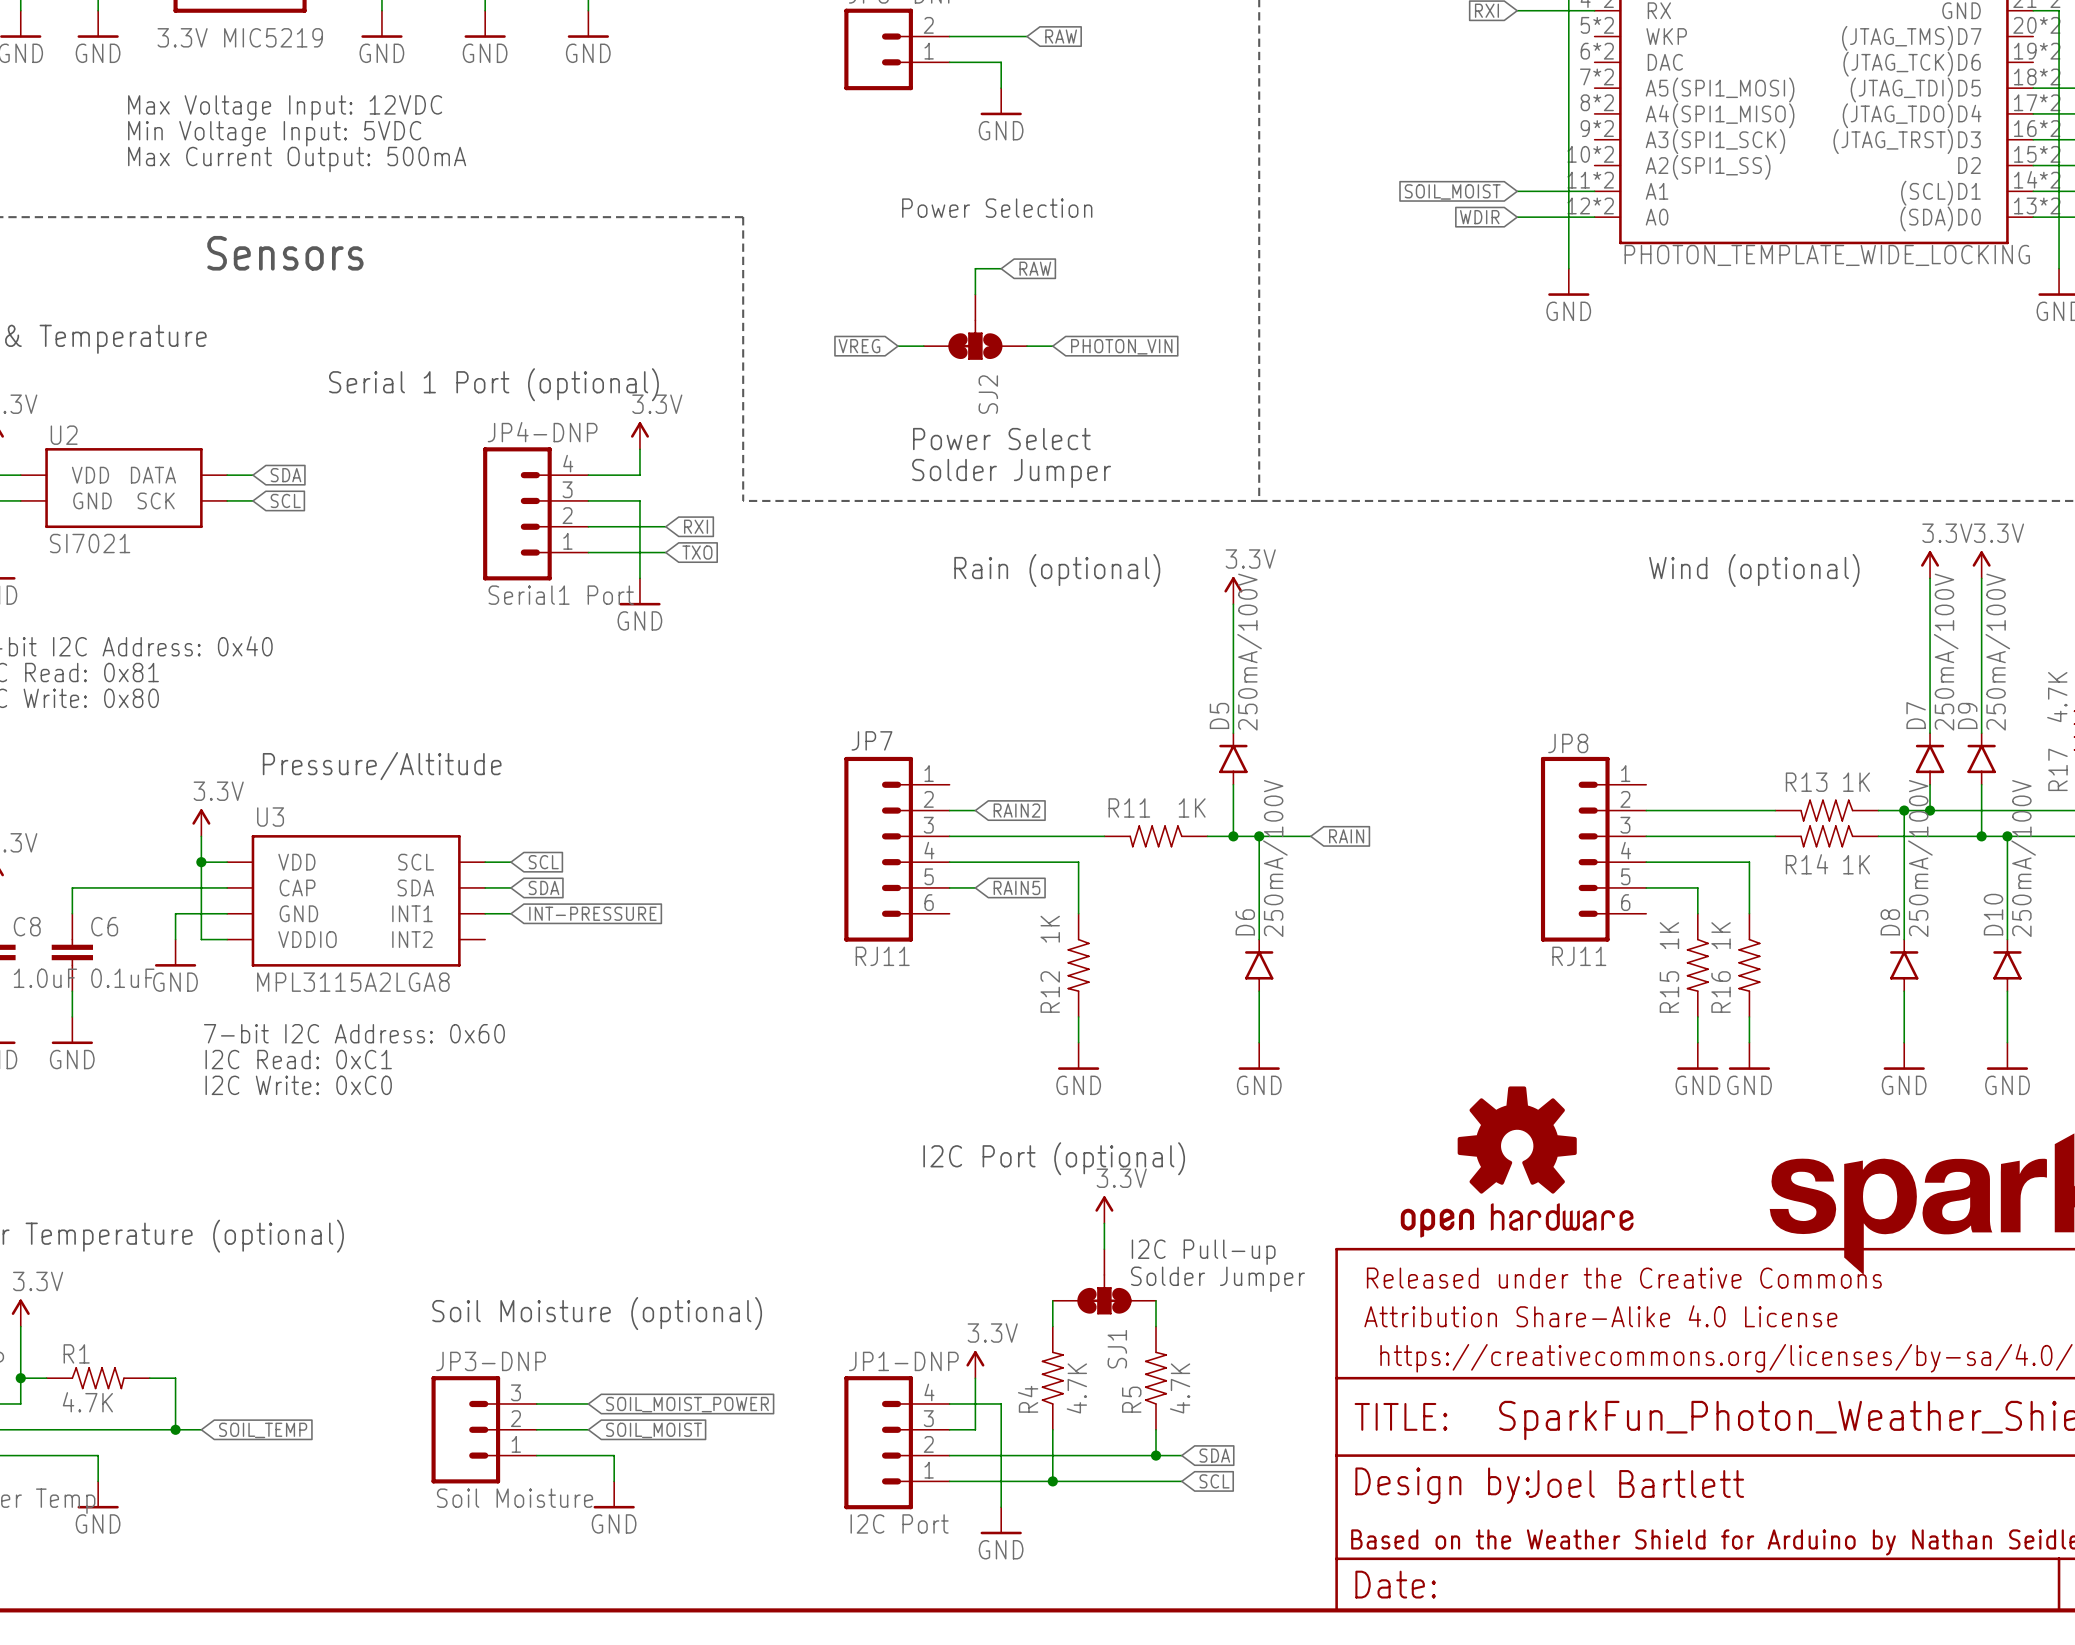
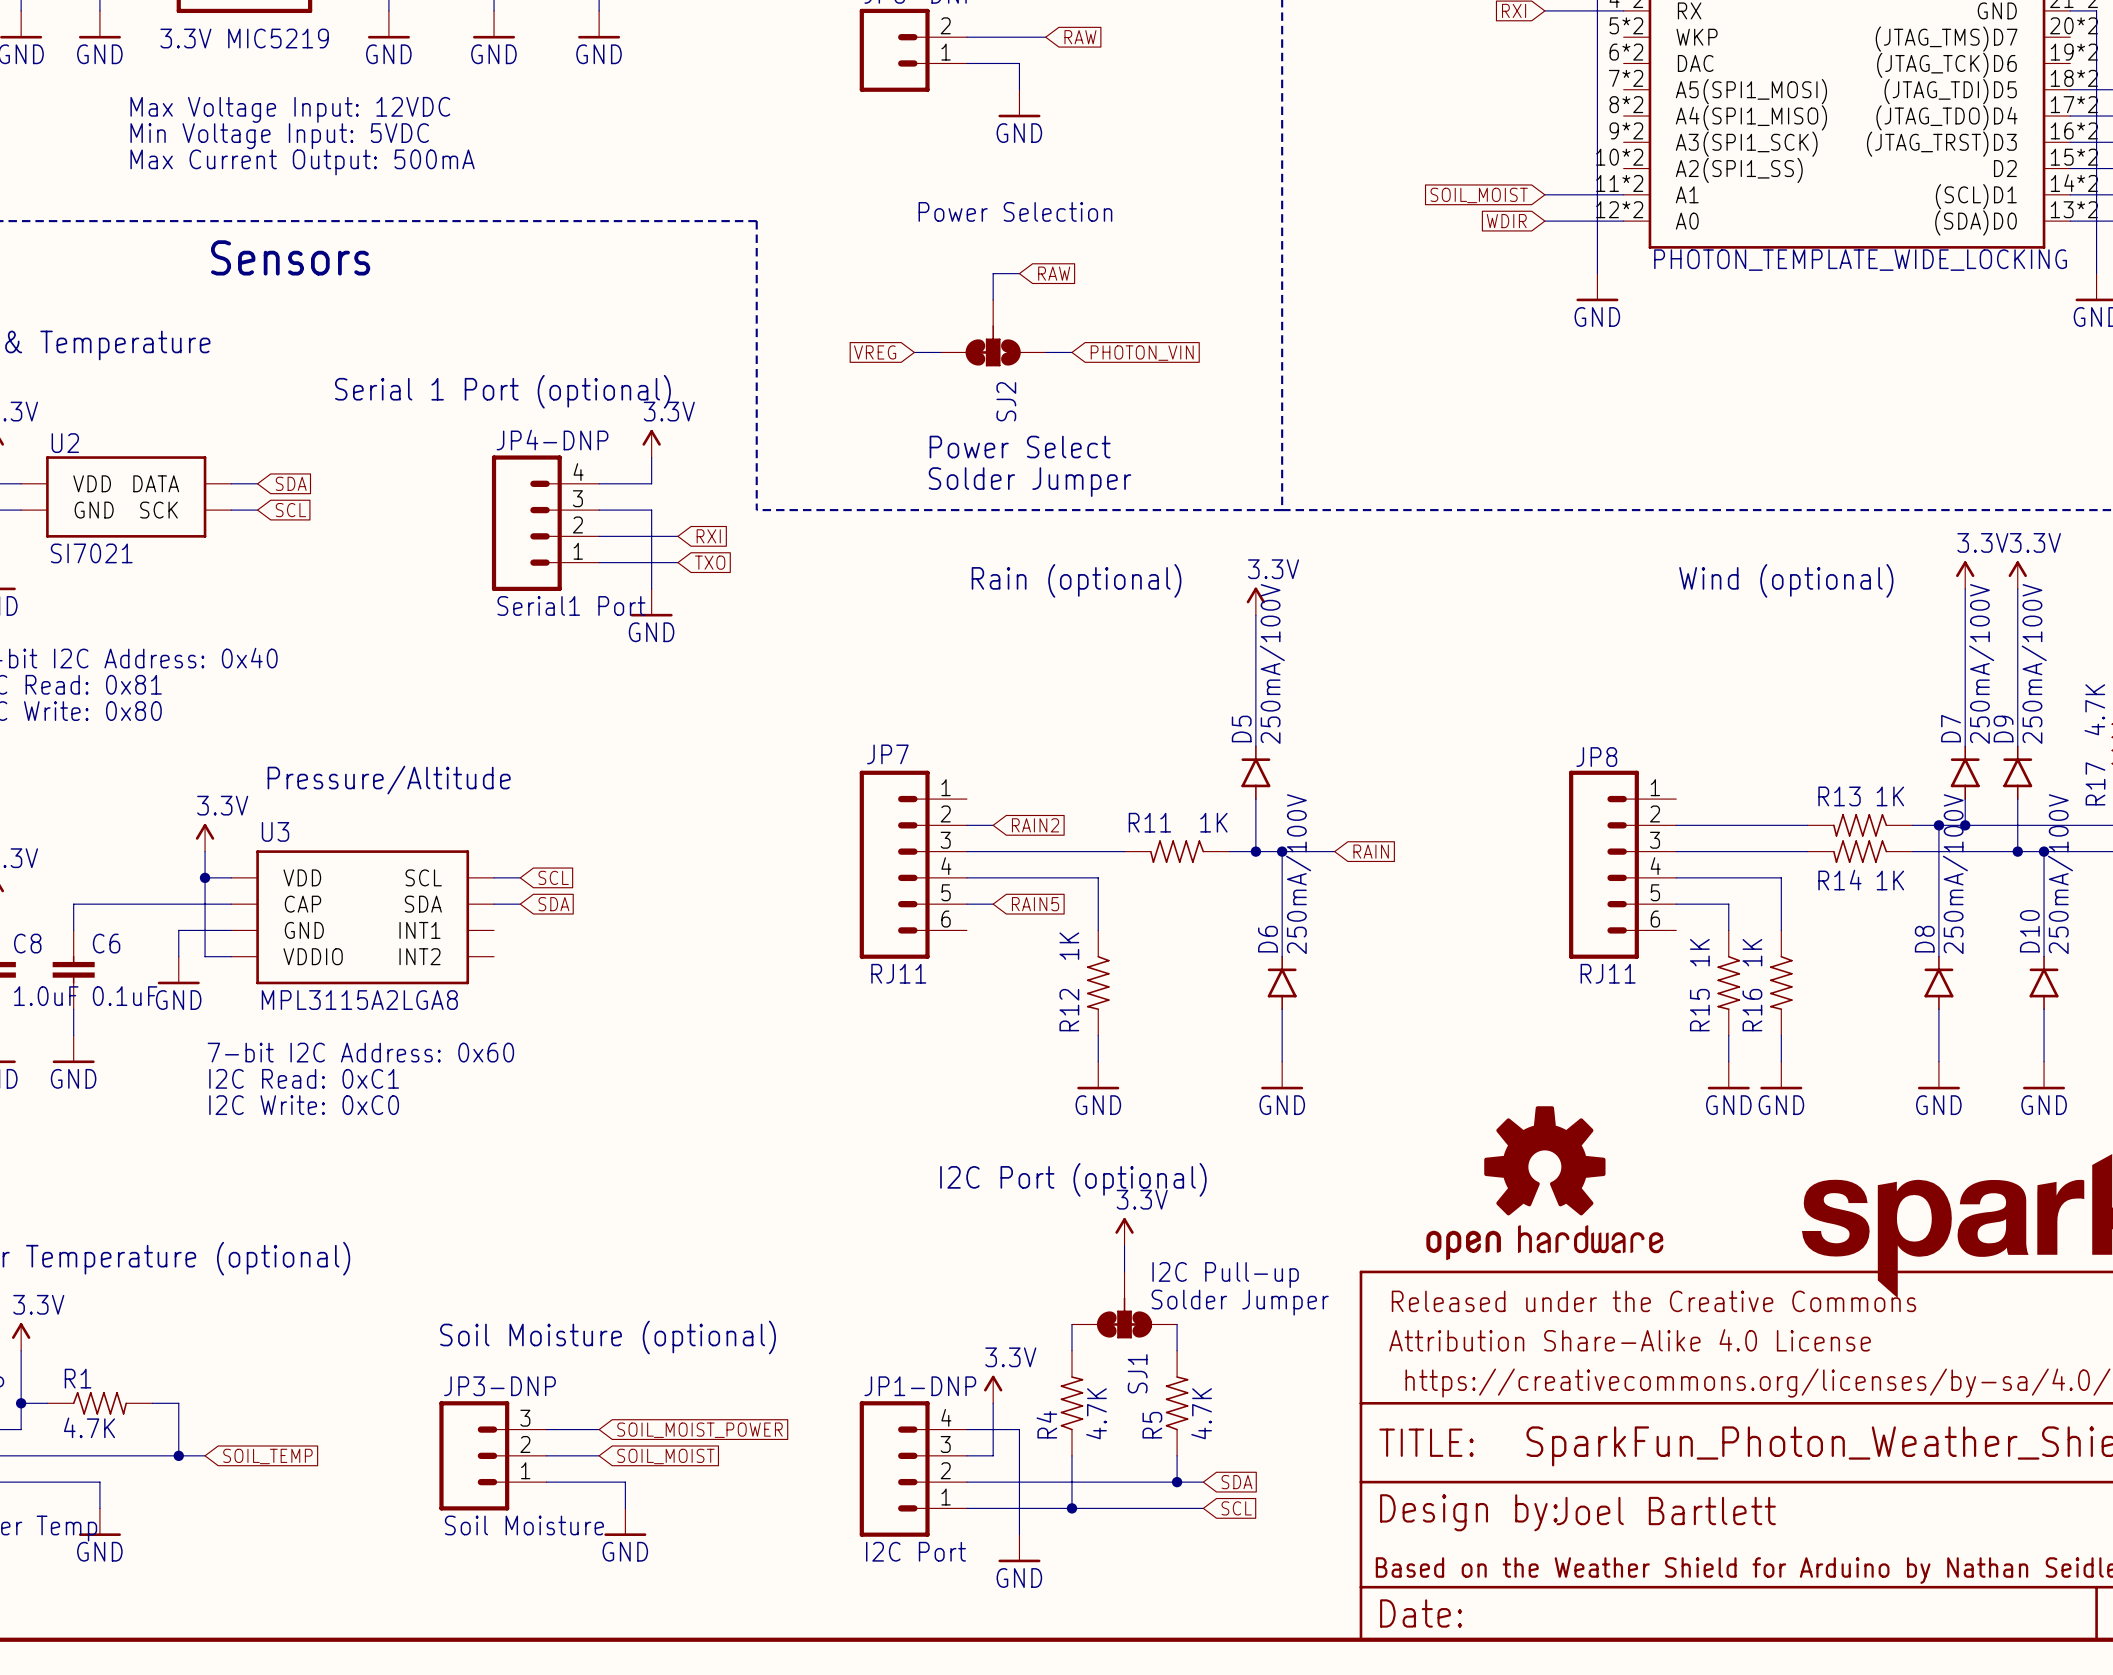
wire: (485, 913) (510, 913) -> none
global label: INT-PRESSURE (592, 913) -> none

